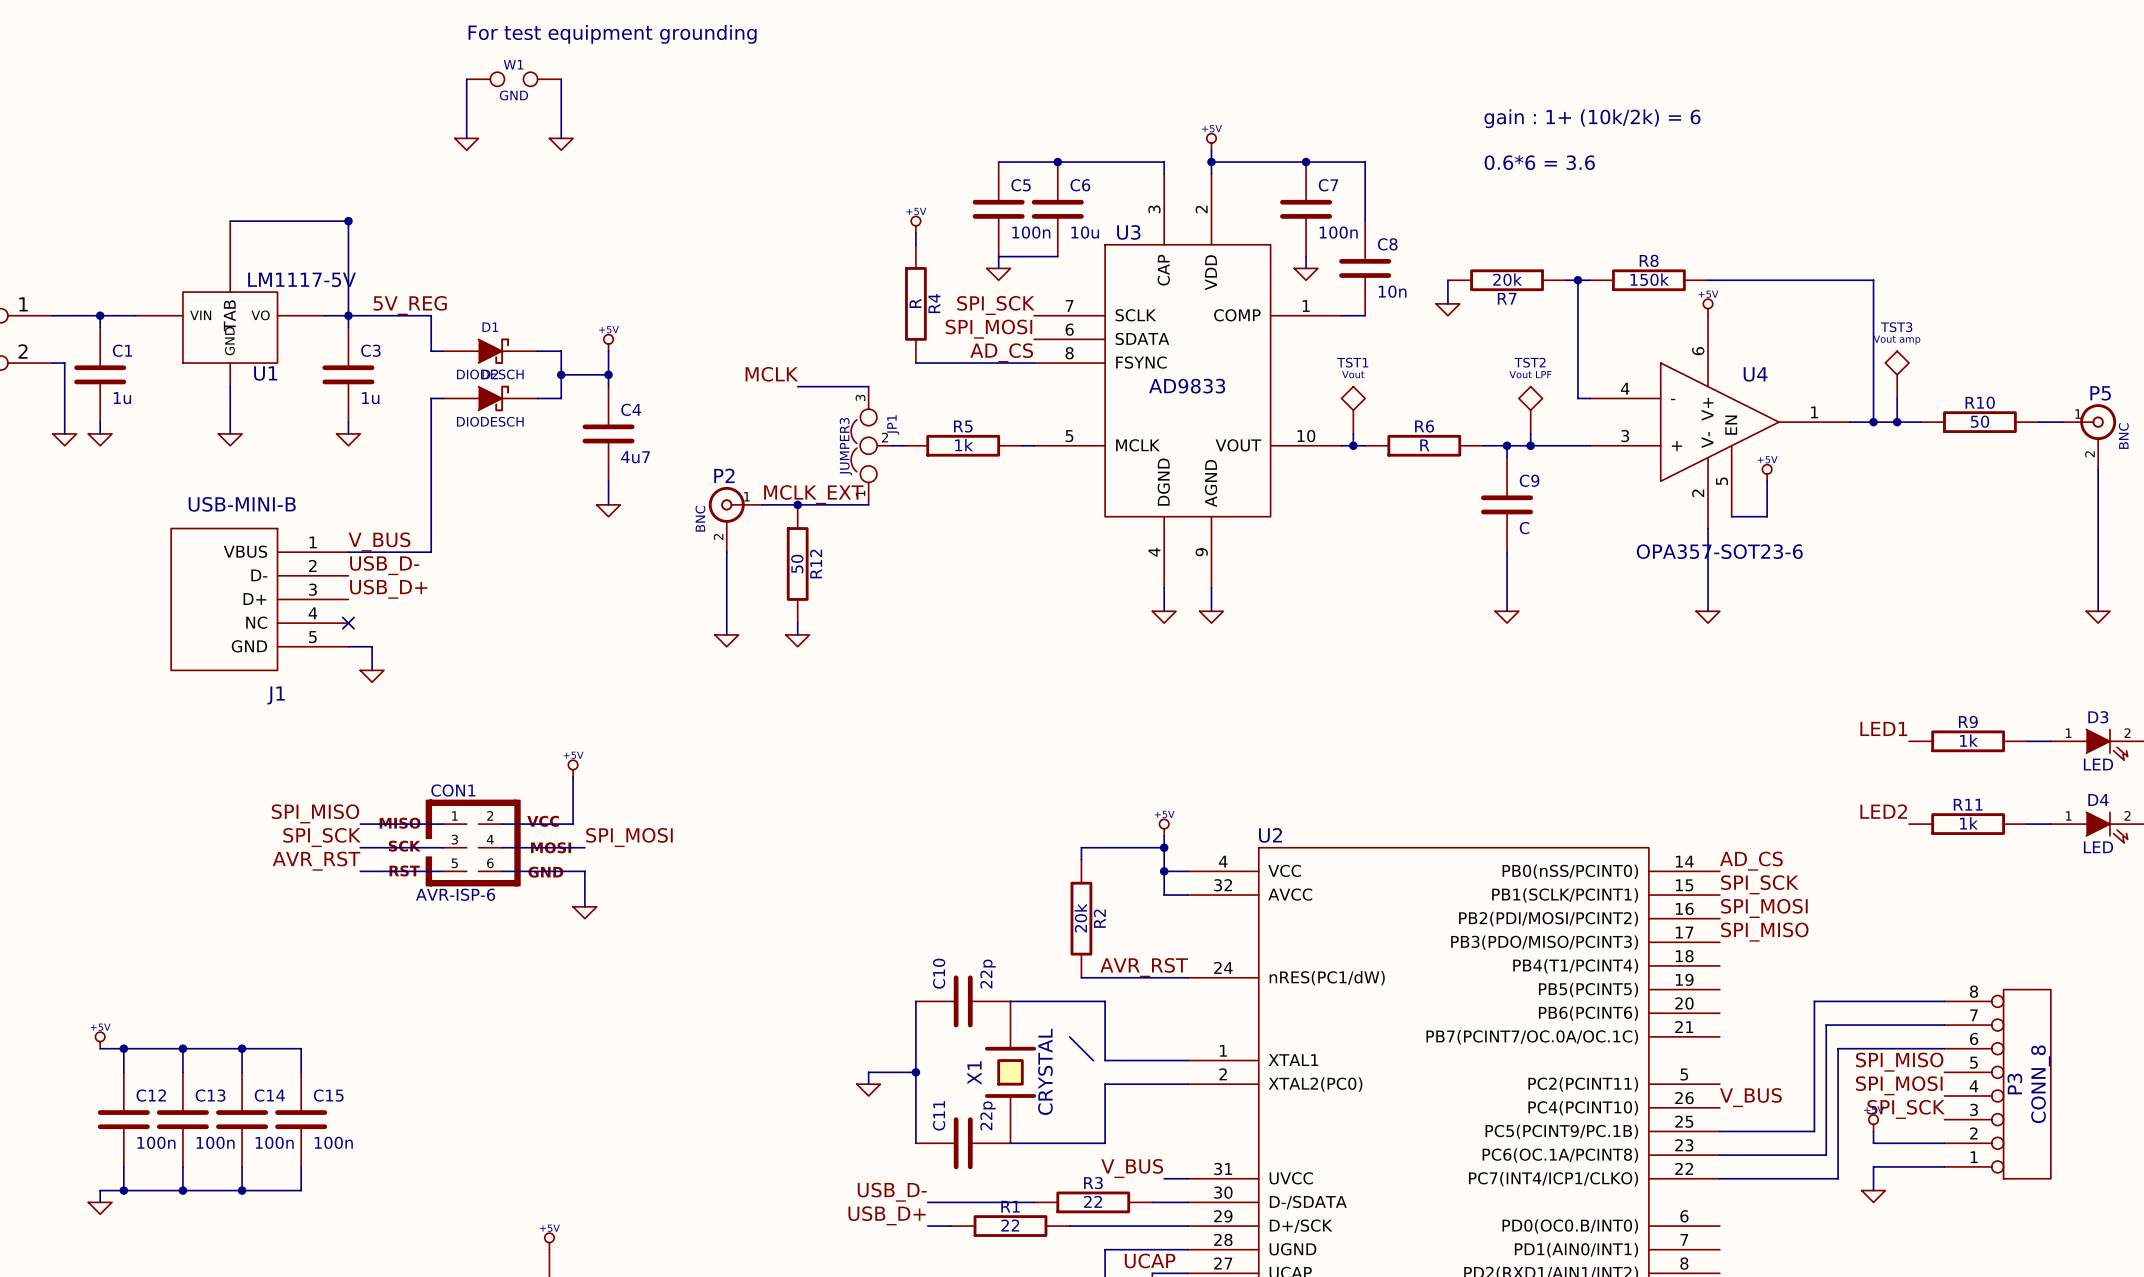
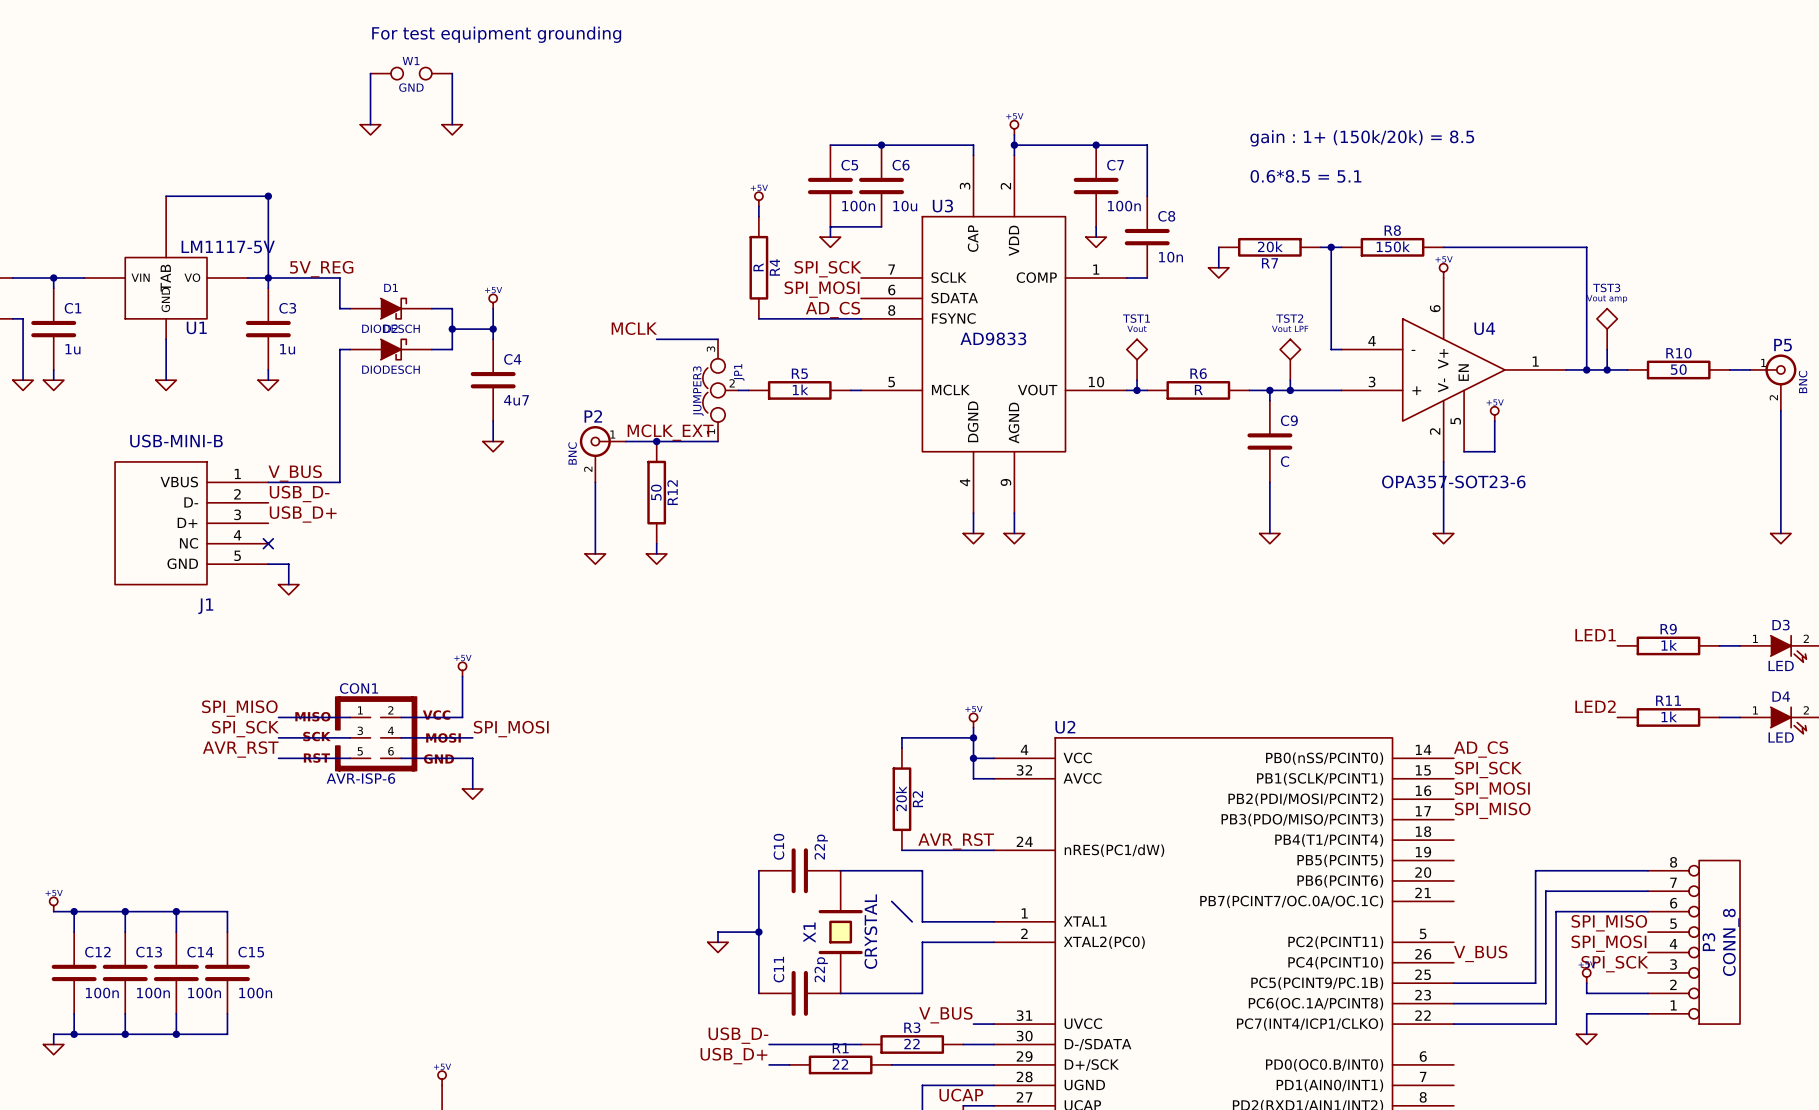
text: gain : 1+ (10k/2k) = 6 (1592, 118) -> none
text: none -> gain : 1+ (150k/20k) = 8.5 (1362, 138)
text: 0.6*6 = 3.6 (1539, 162) -> none
text: none -> 0.6*8.5 = 5.1 (1305, 176)

